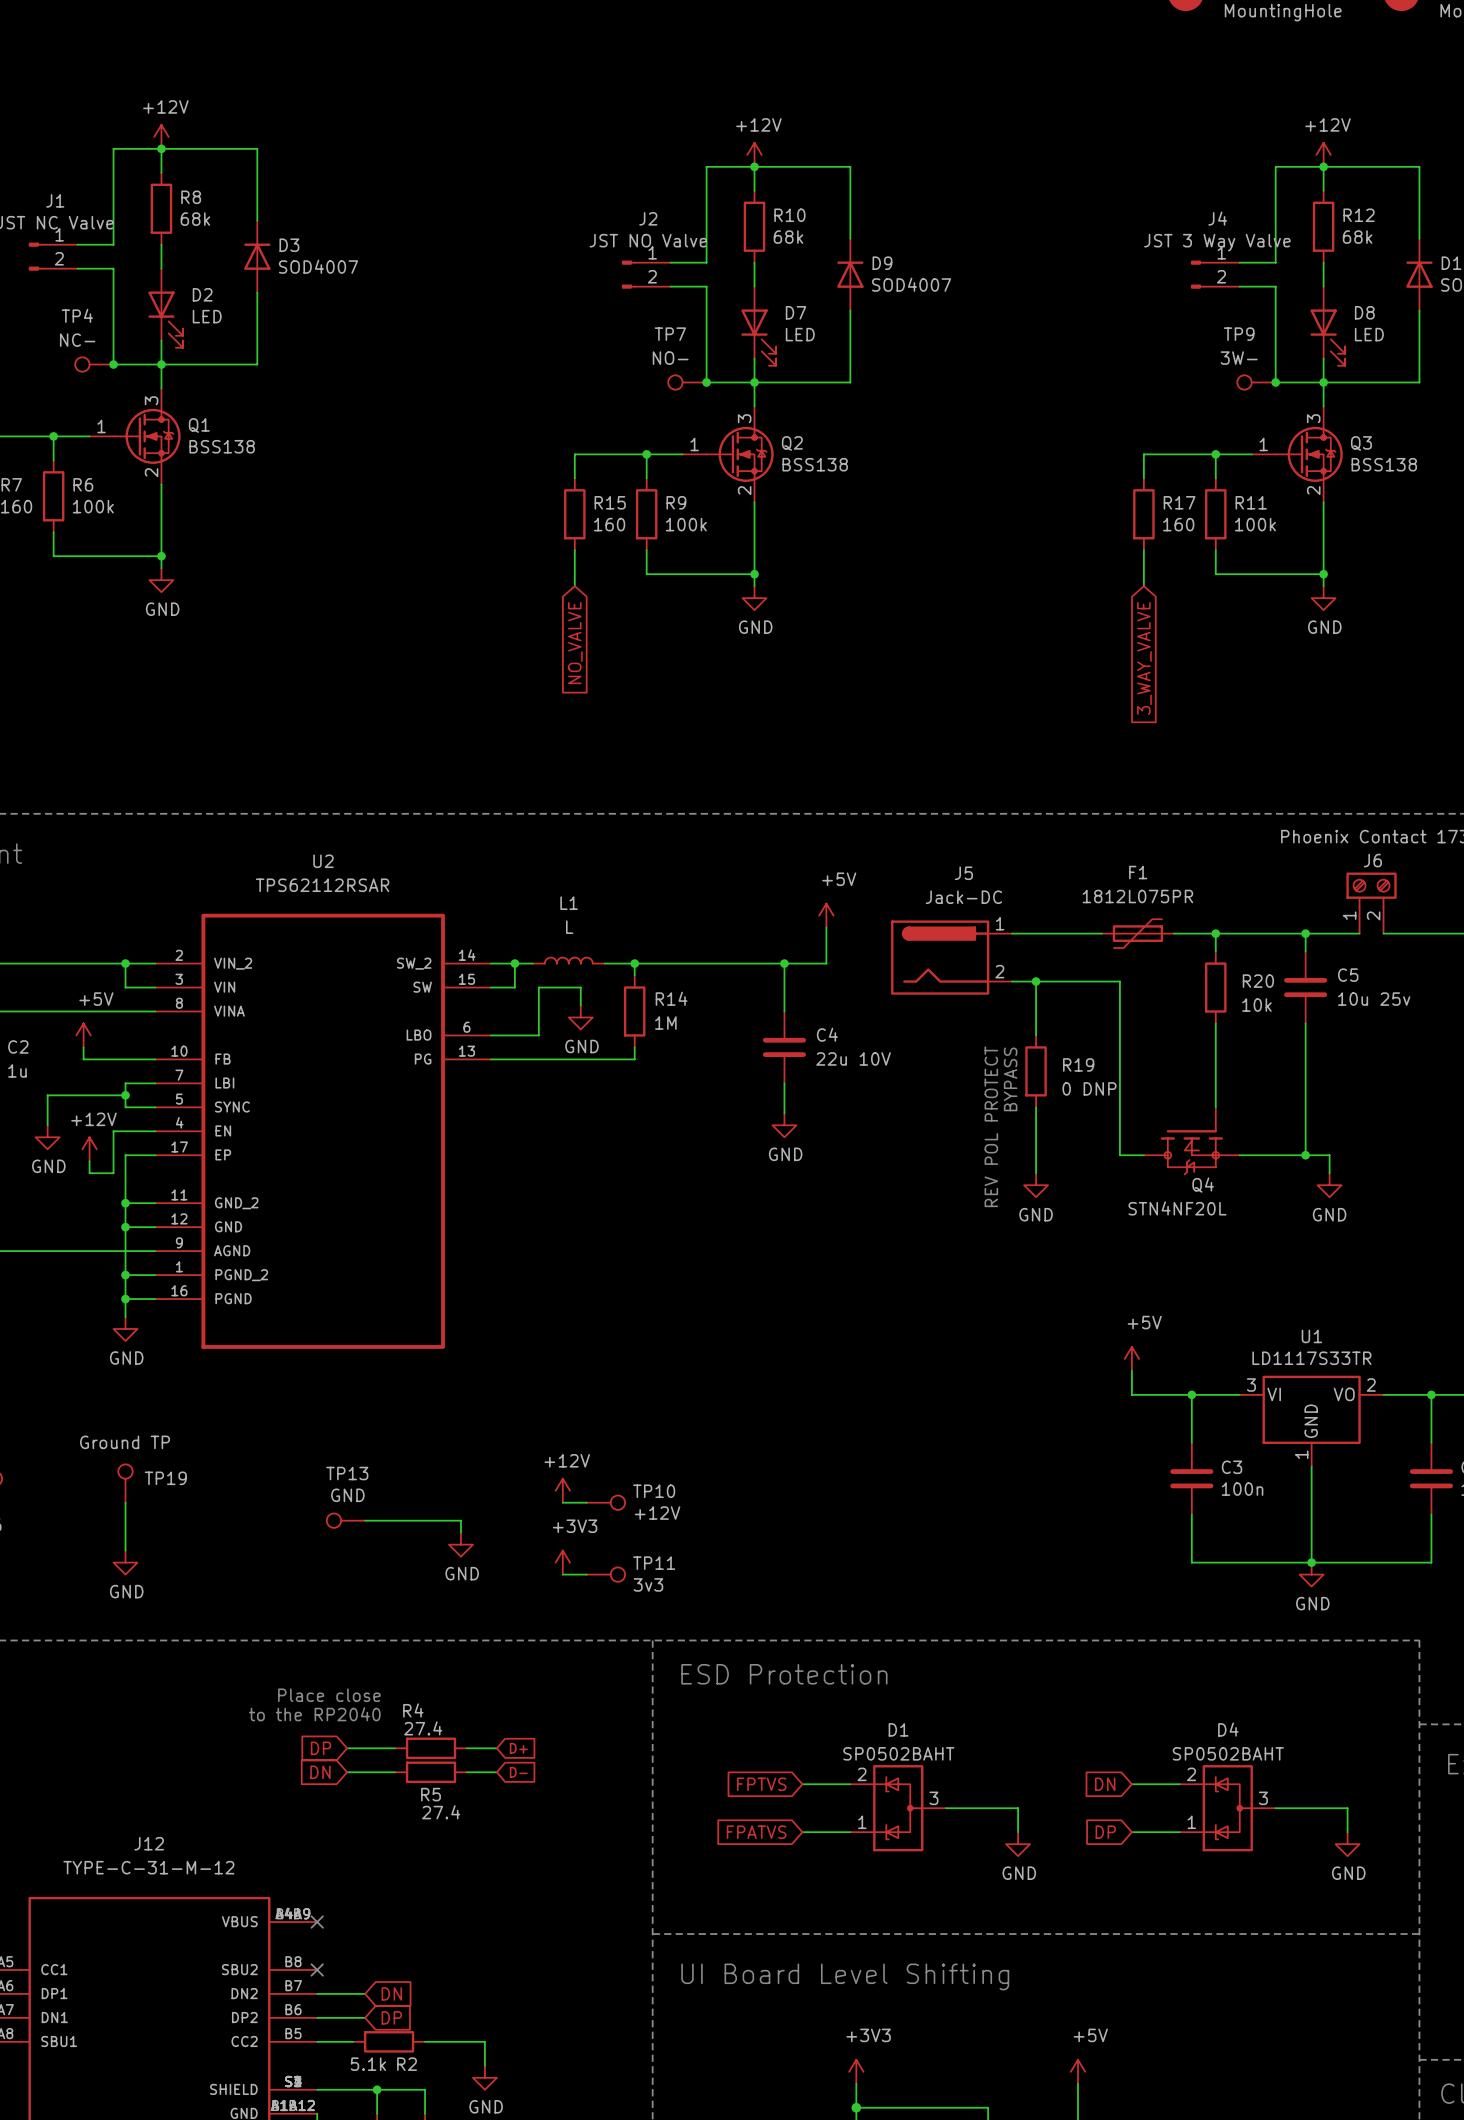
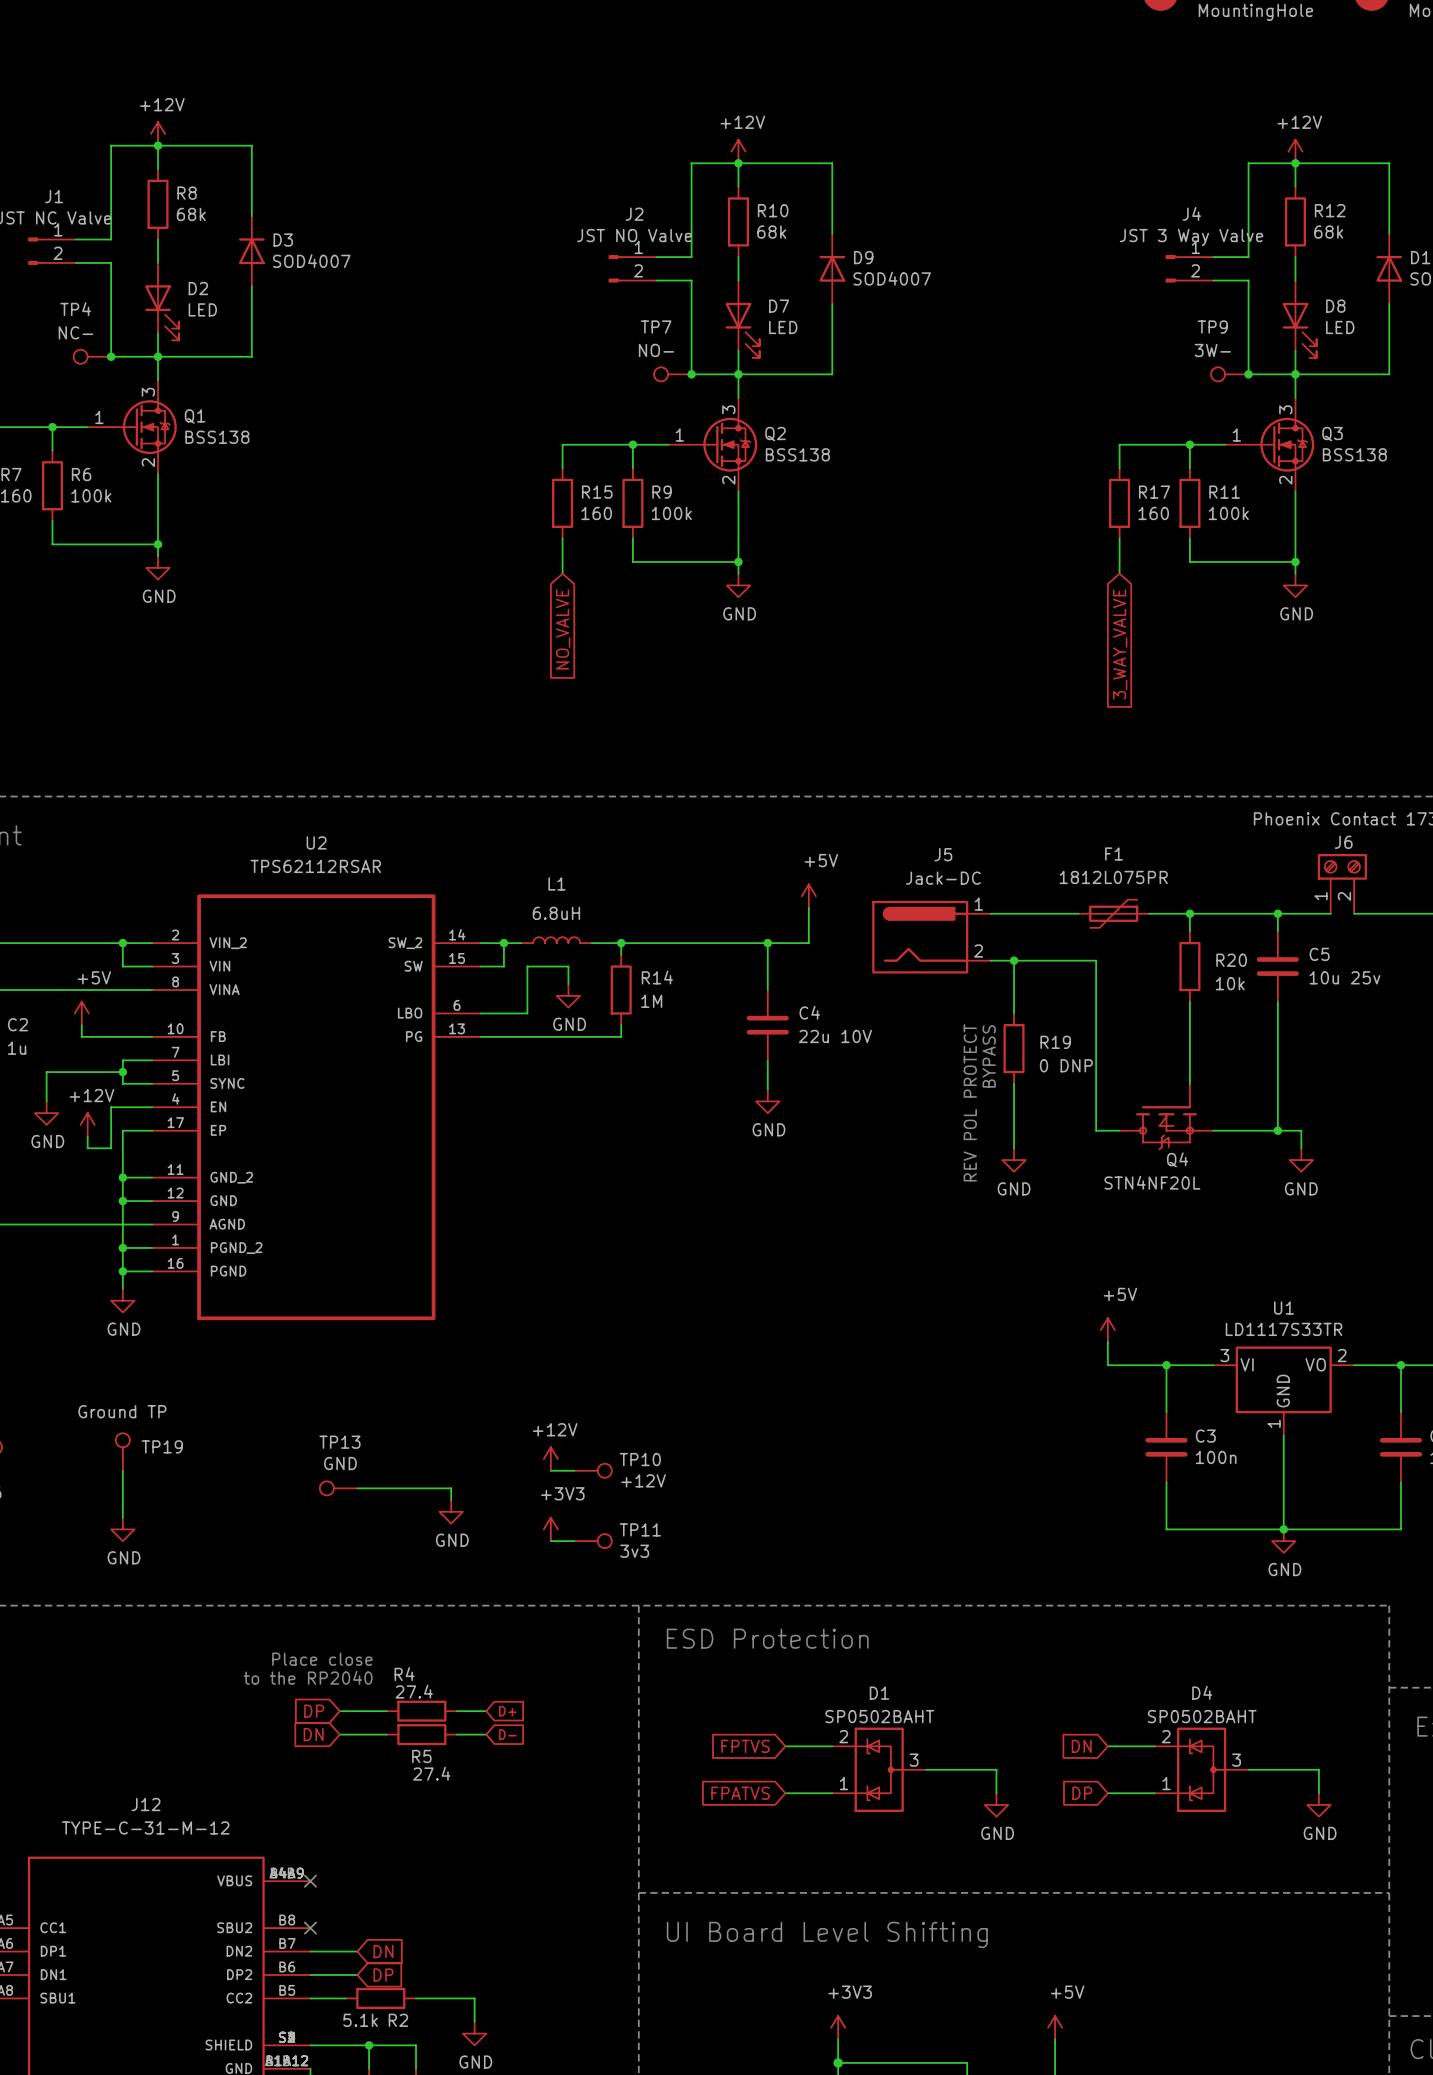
L1 value: L (569, 927) -> 6.8uH (556, 913)

